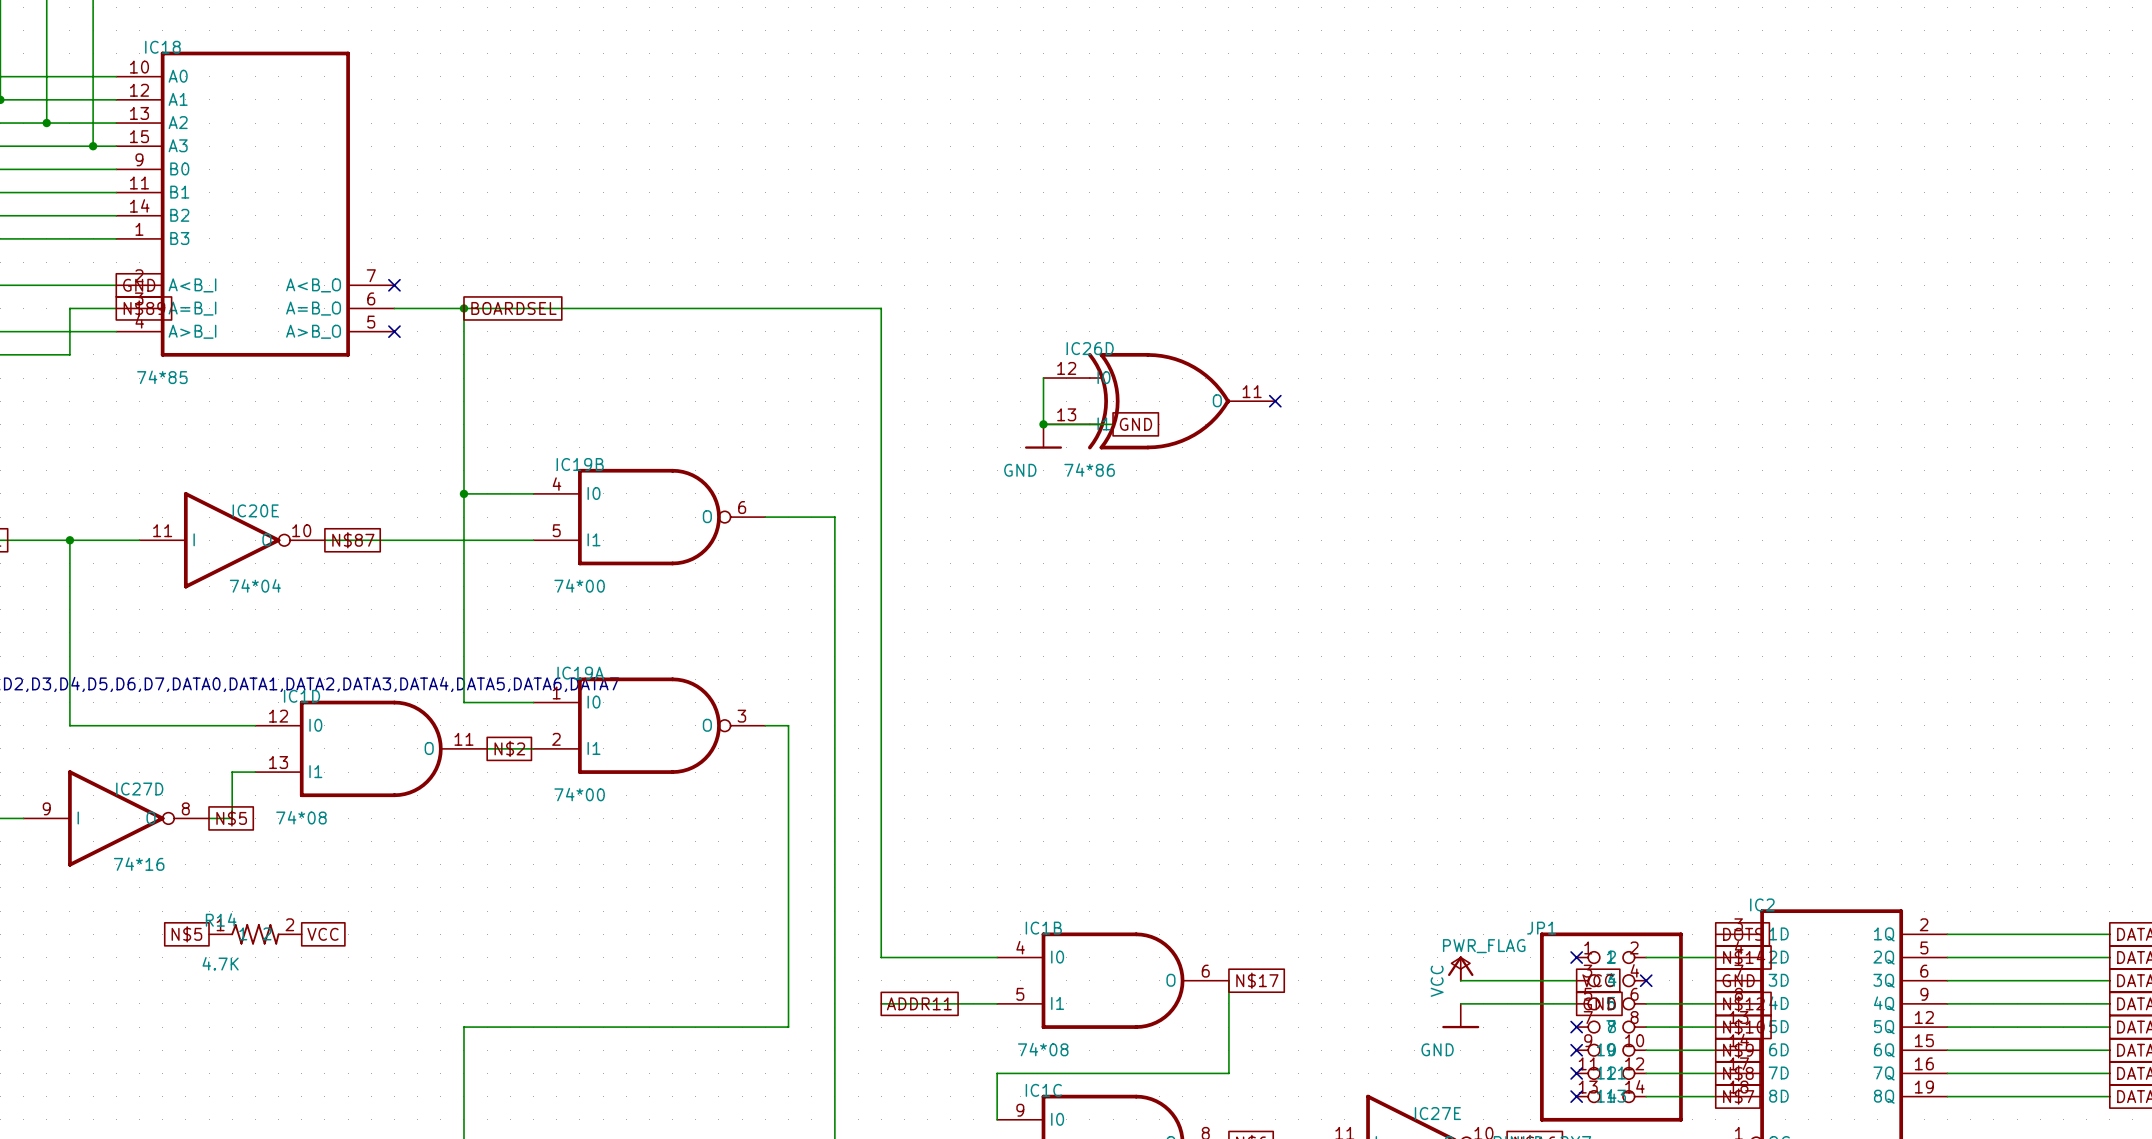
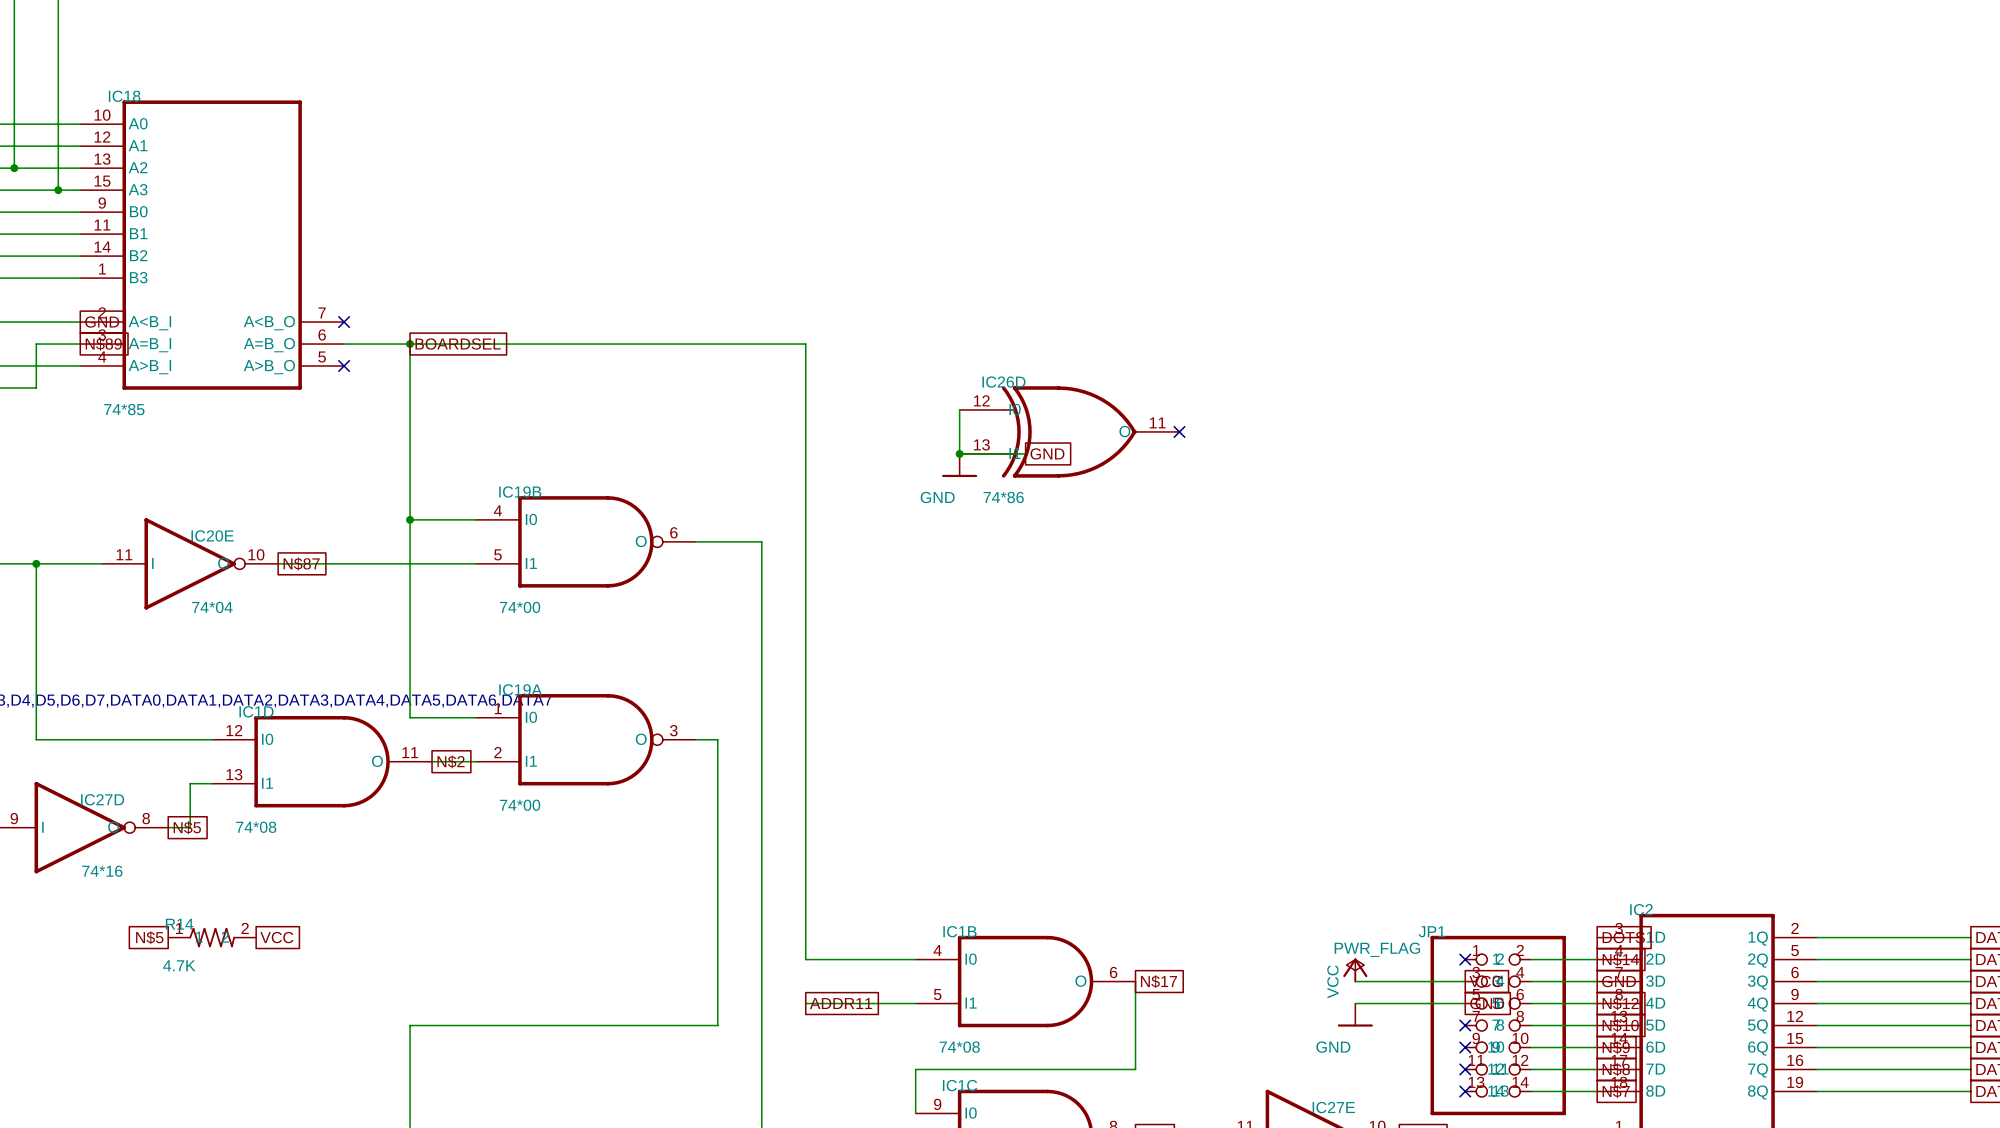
wire: none -> (1531, 981) (1597, 981)
no-connect mark: (1646, 980) -> none

